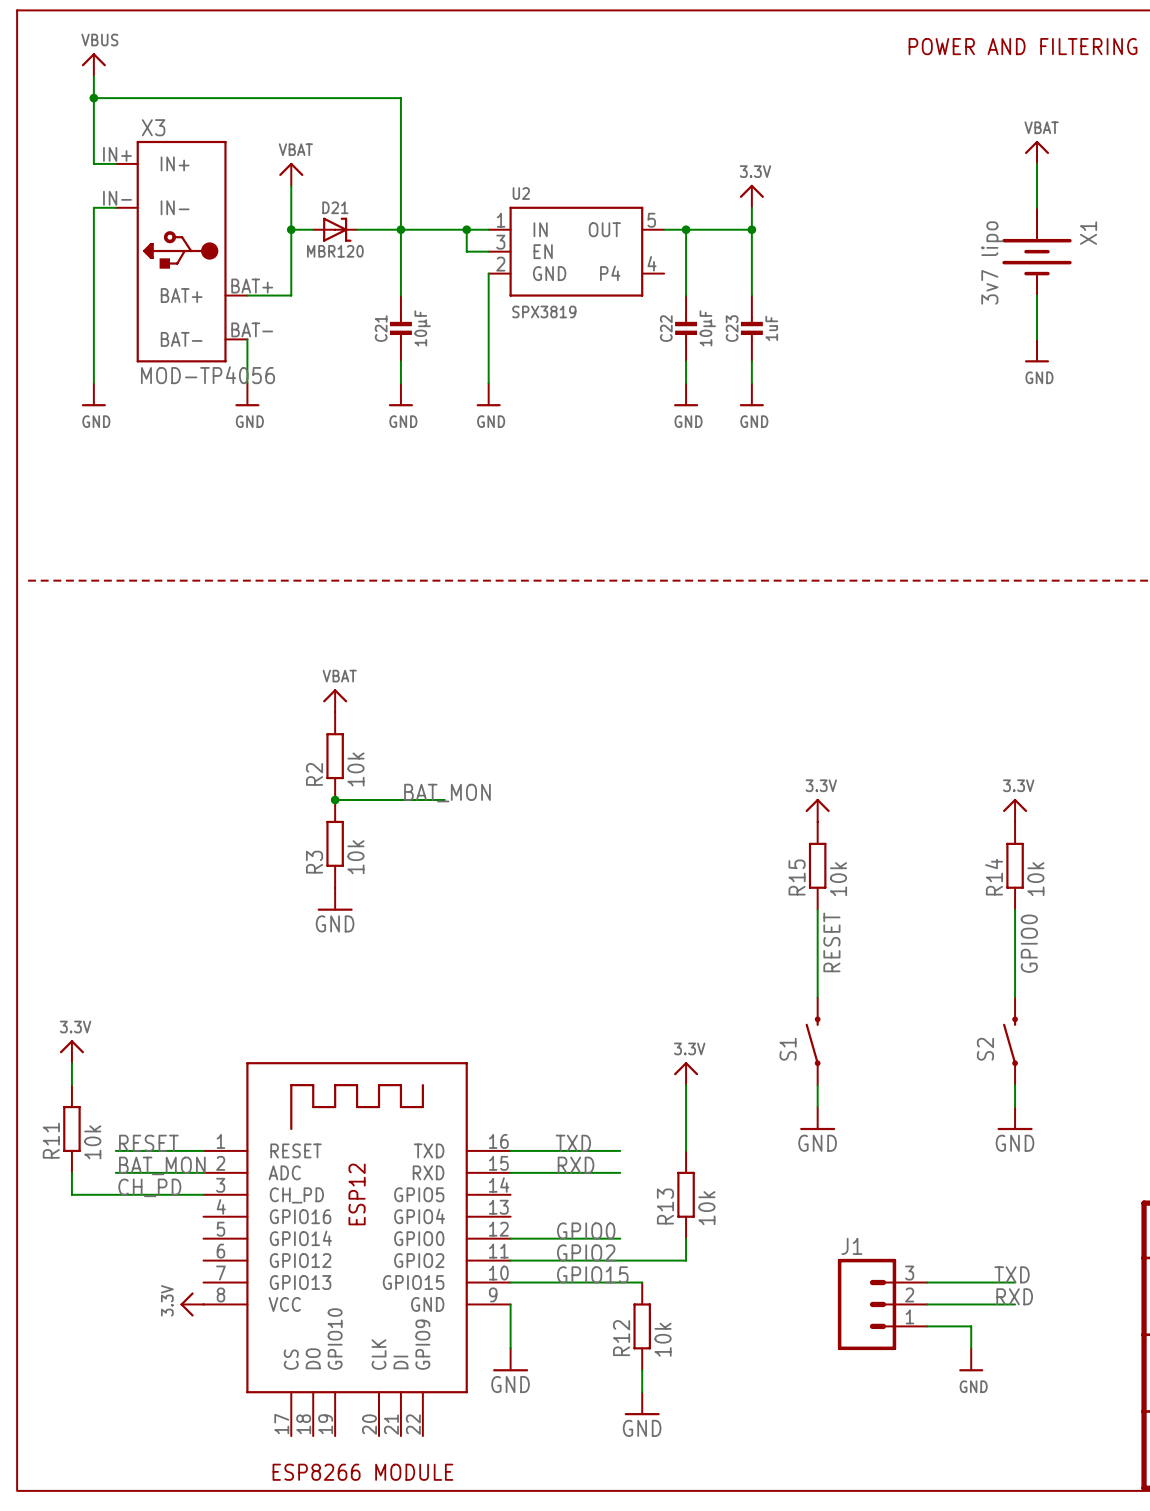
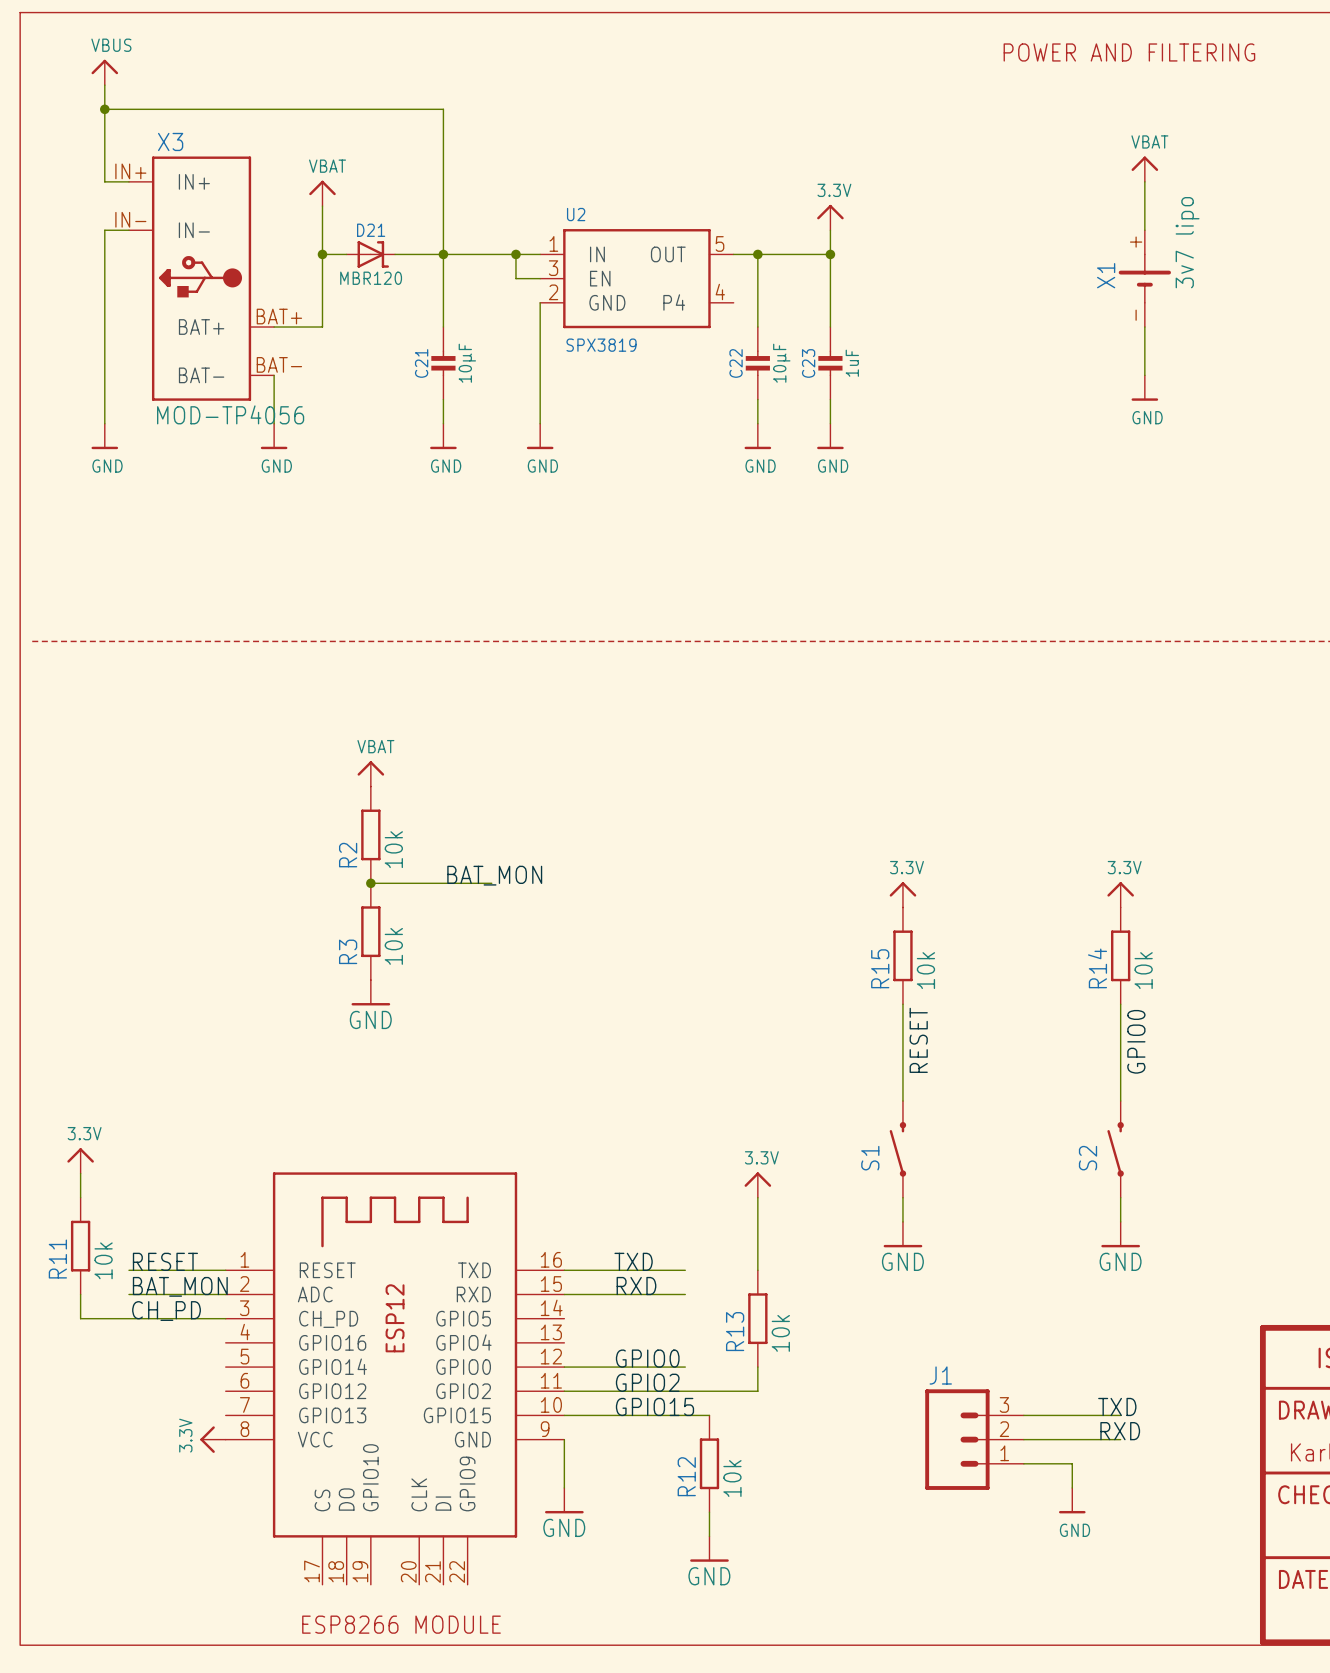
X1 symbol: [1002, 207, 1072, 296] -> [1118, 230, 1171, 328]
X1 name position: X1 (1088, 233) -> X1 (1106, 275)
X1 value position: 3v7 lipo (992, 263) -> 3v7 lipo (1187, 242)

